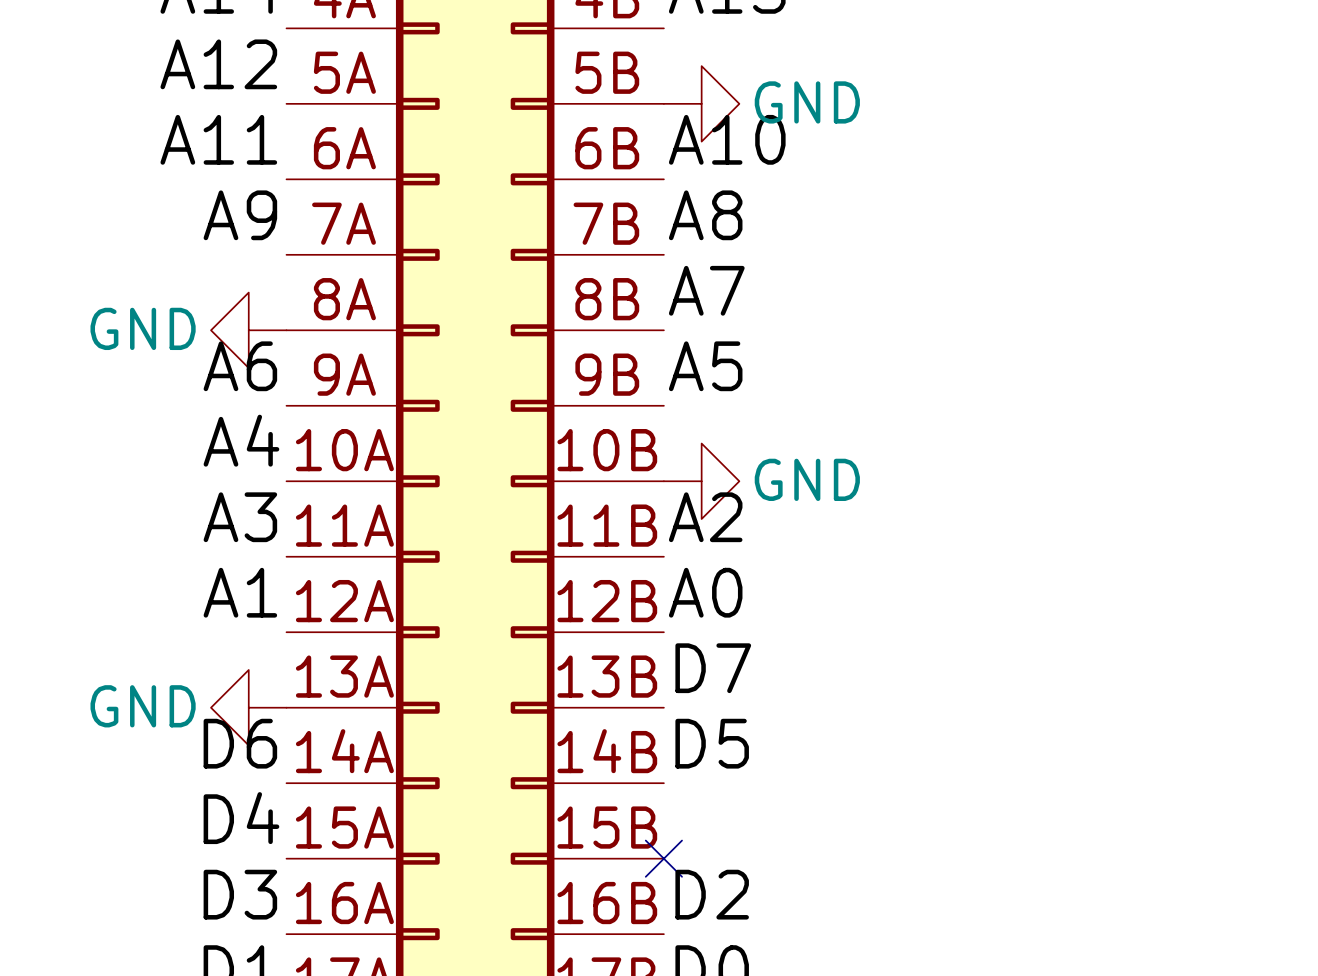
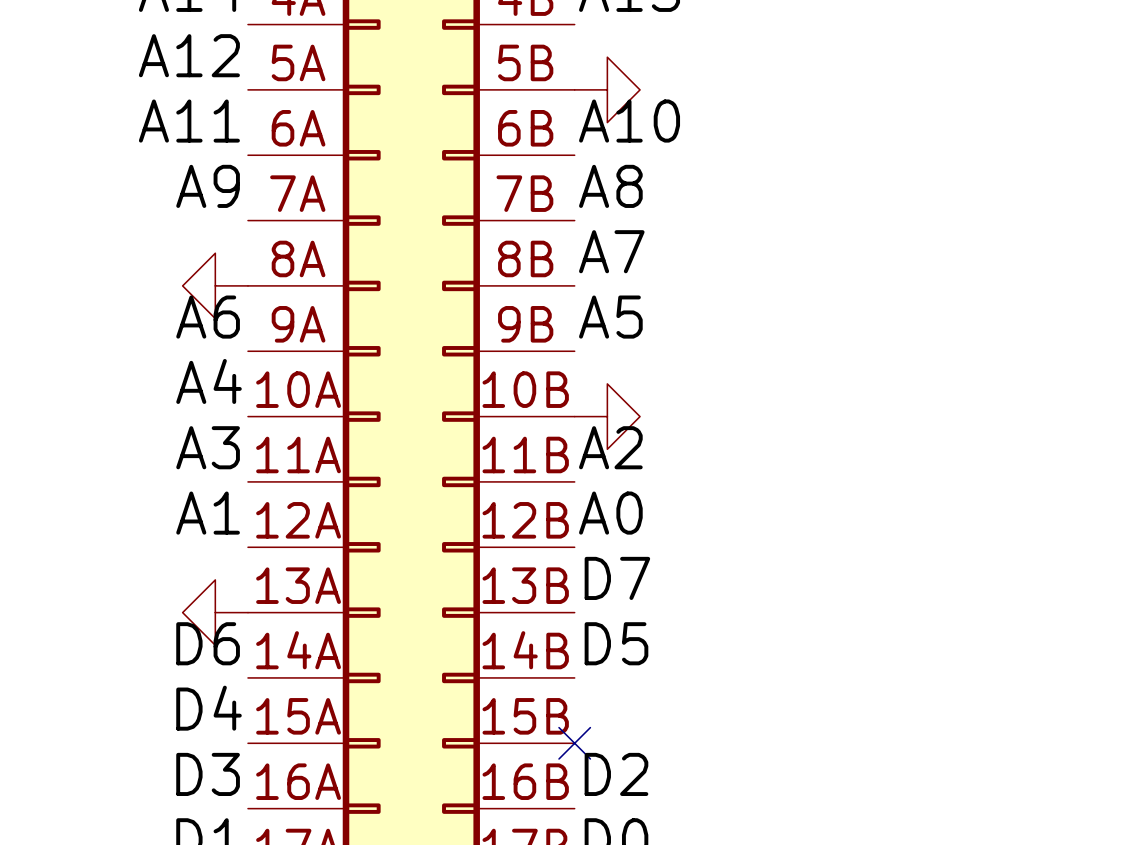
power symbol text: GND (807, 102) -> none
power symbol text: GND (143, 328) -> none
power symbol text: GND (807, 479) -> none
power symbol text: GND (143, 706) -> none

